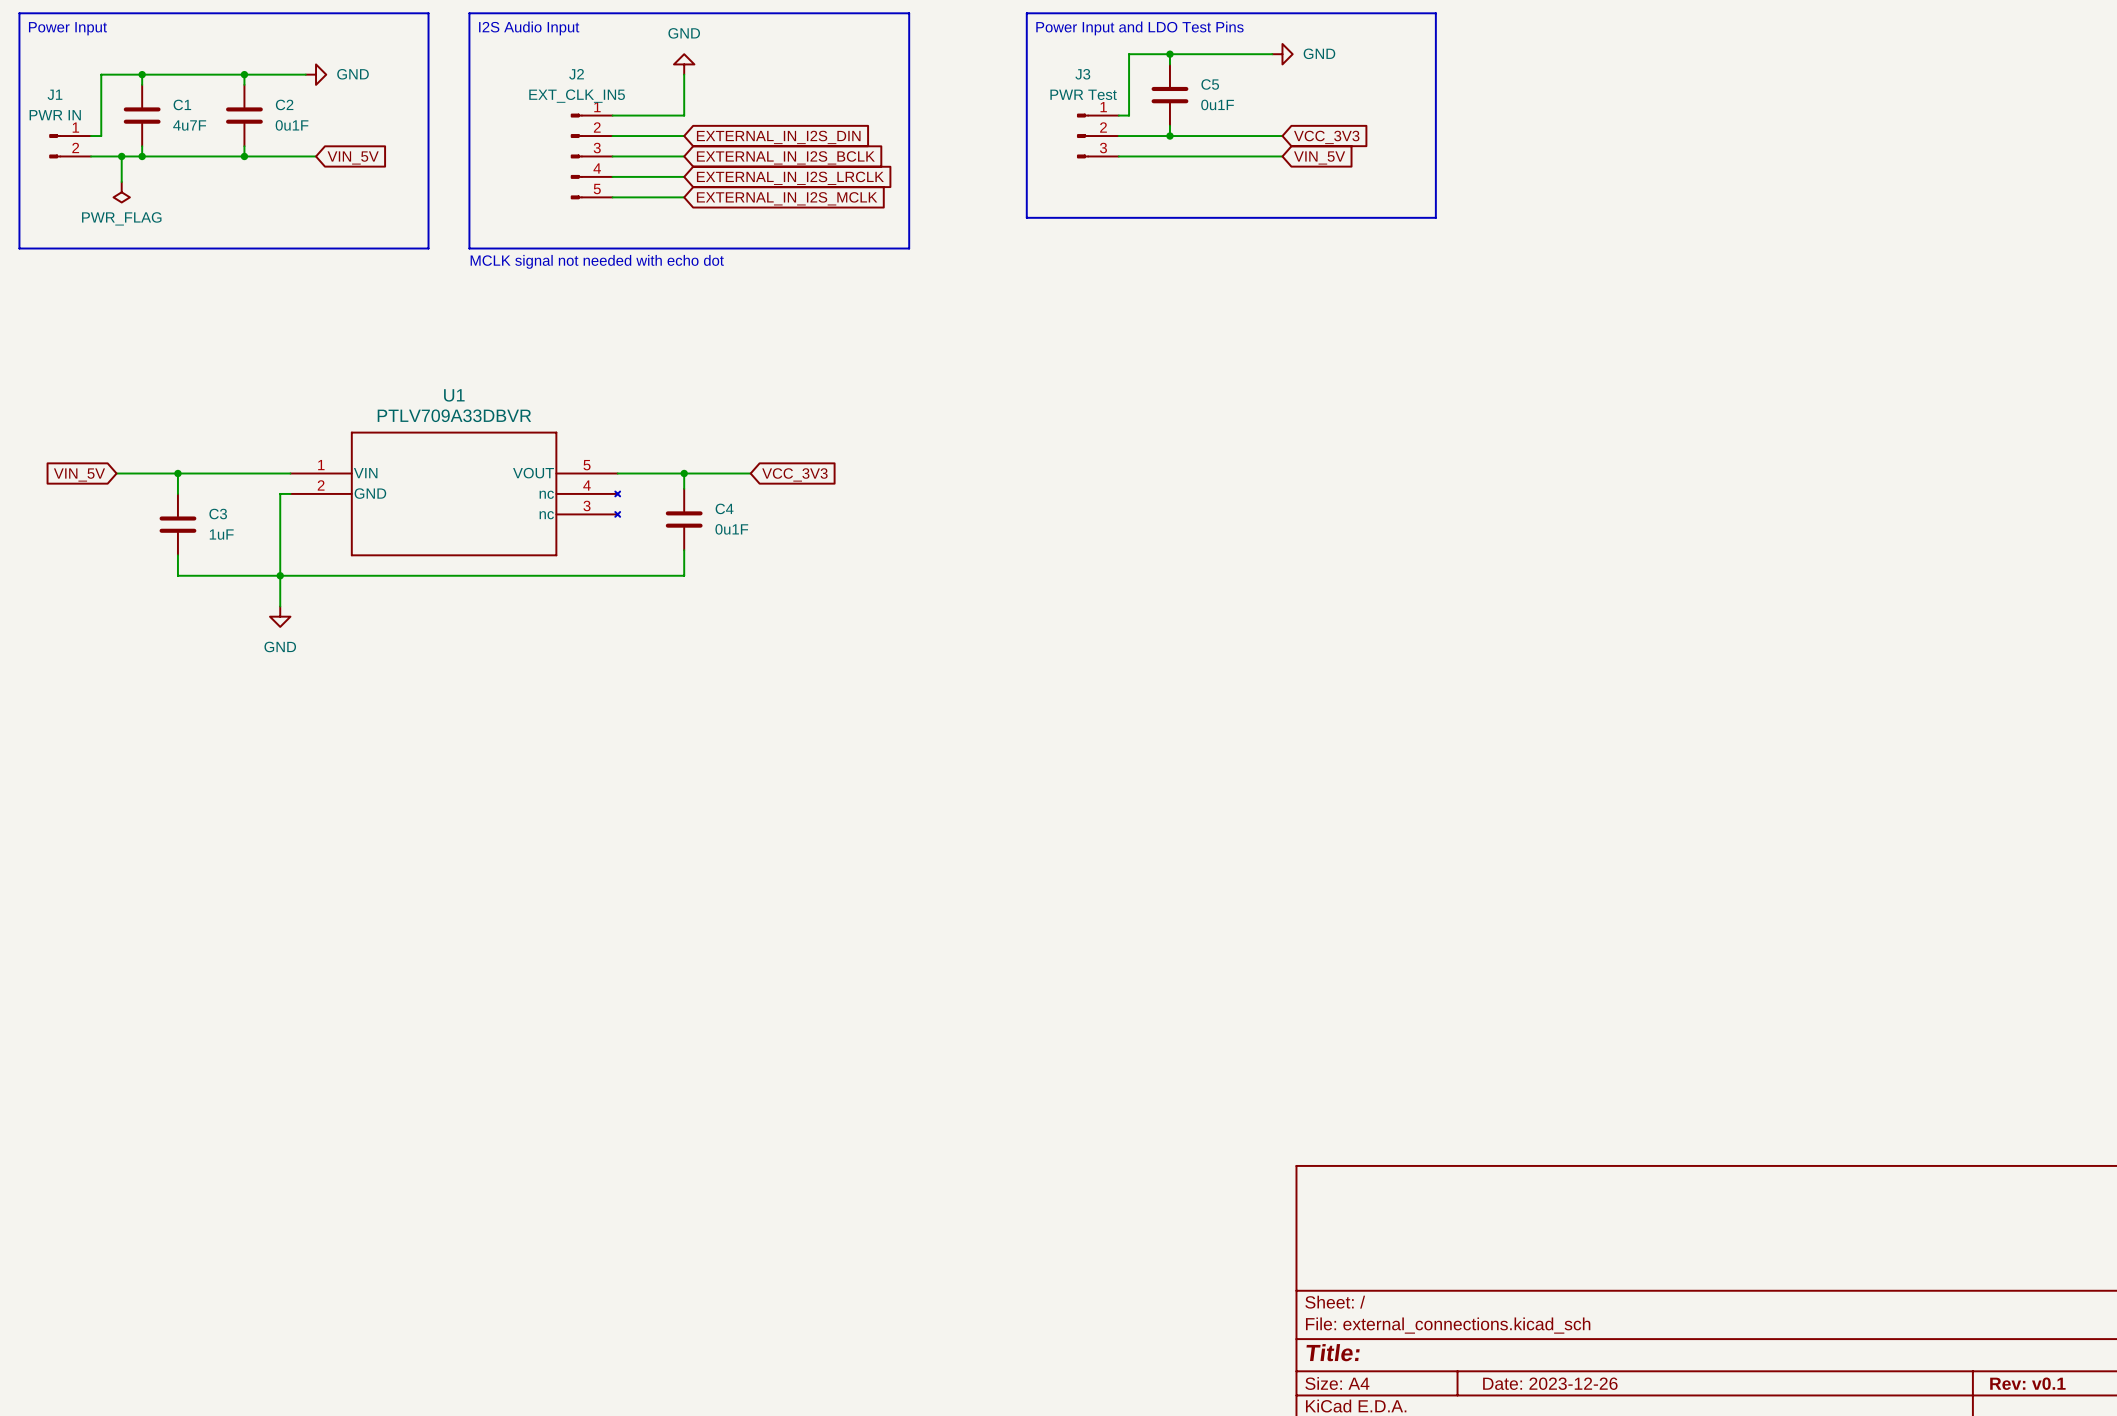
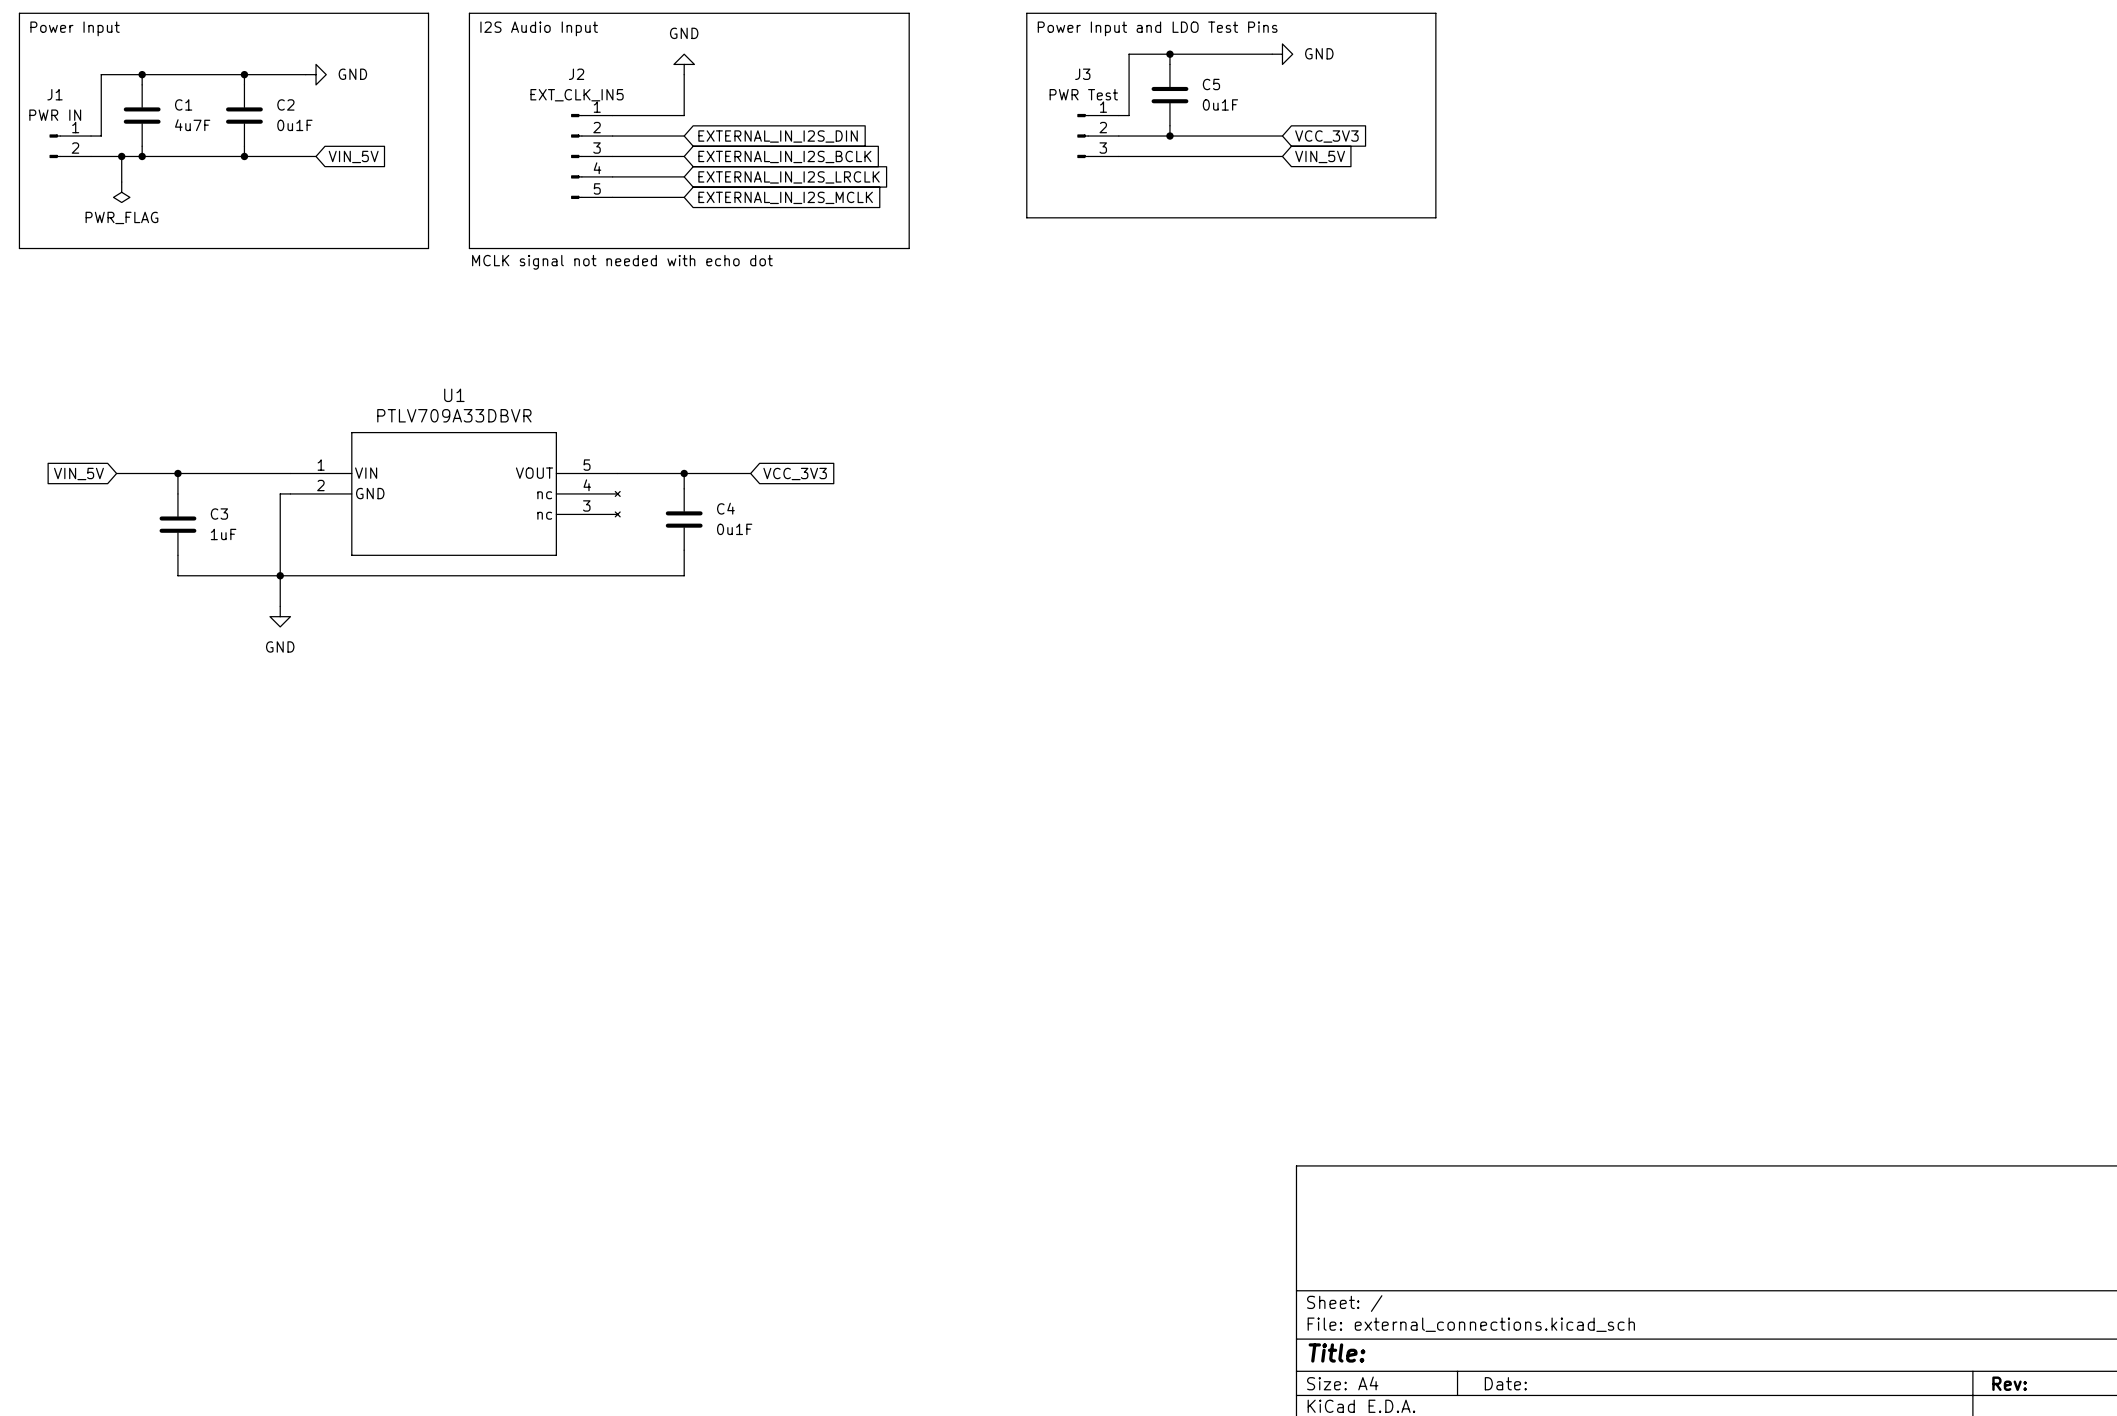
title block: Date: 2023-12-26 (1550, 1383) -> Date: (1505, 1383)
title block: Rev: v0.1 (2027, 1383) -> Rev: (2009, 1383)

